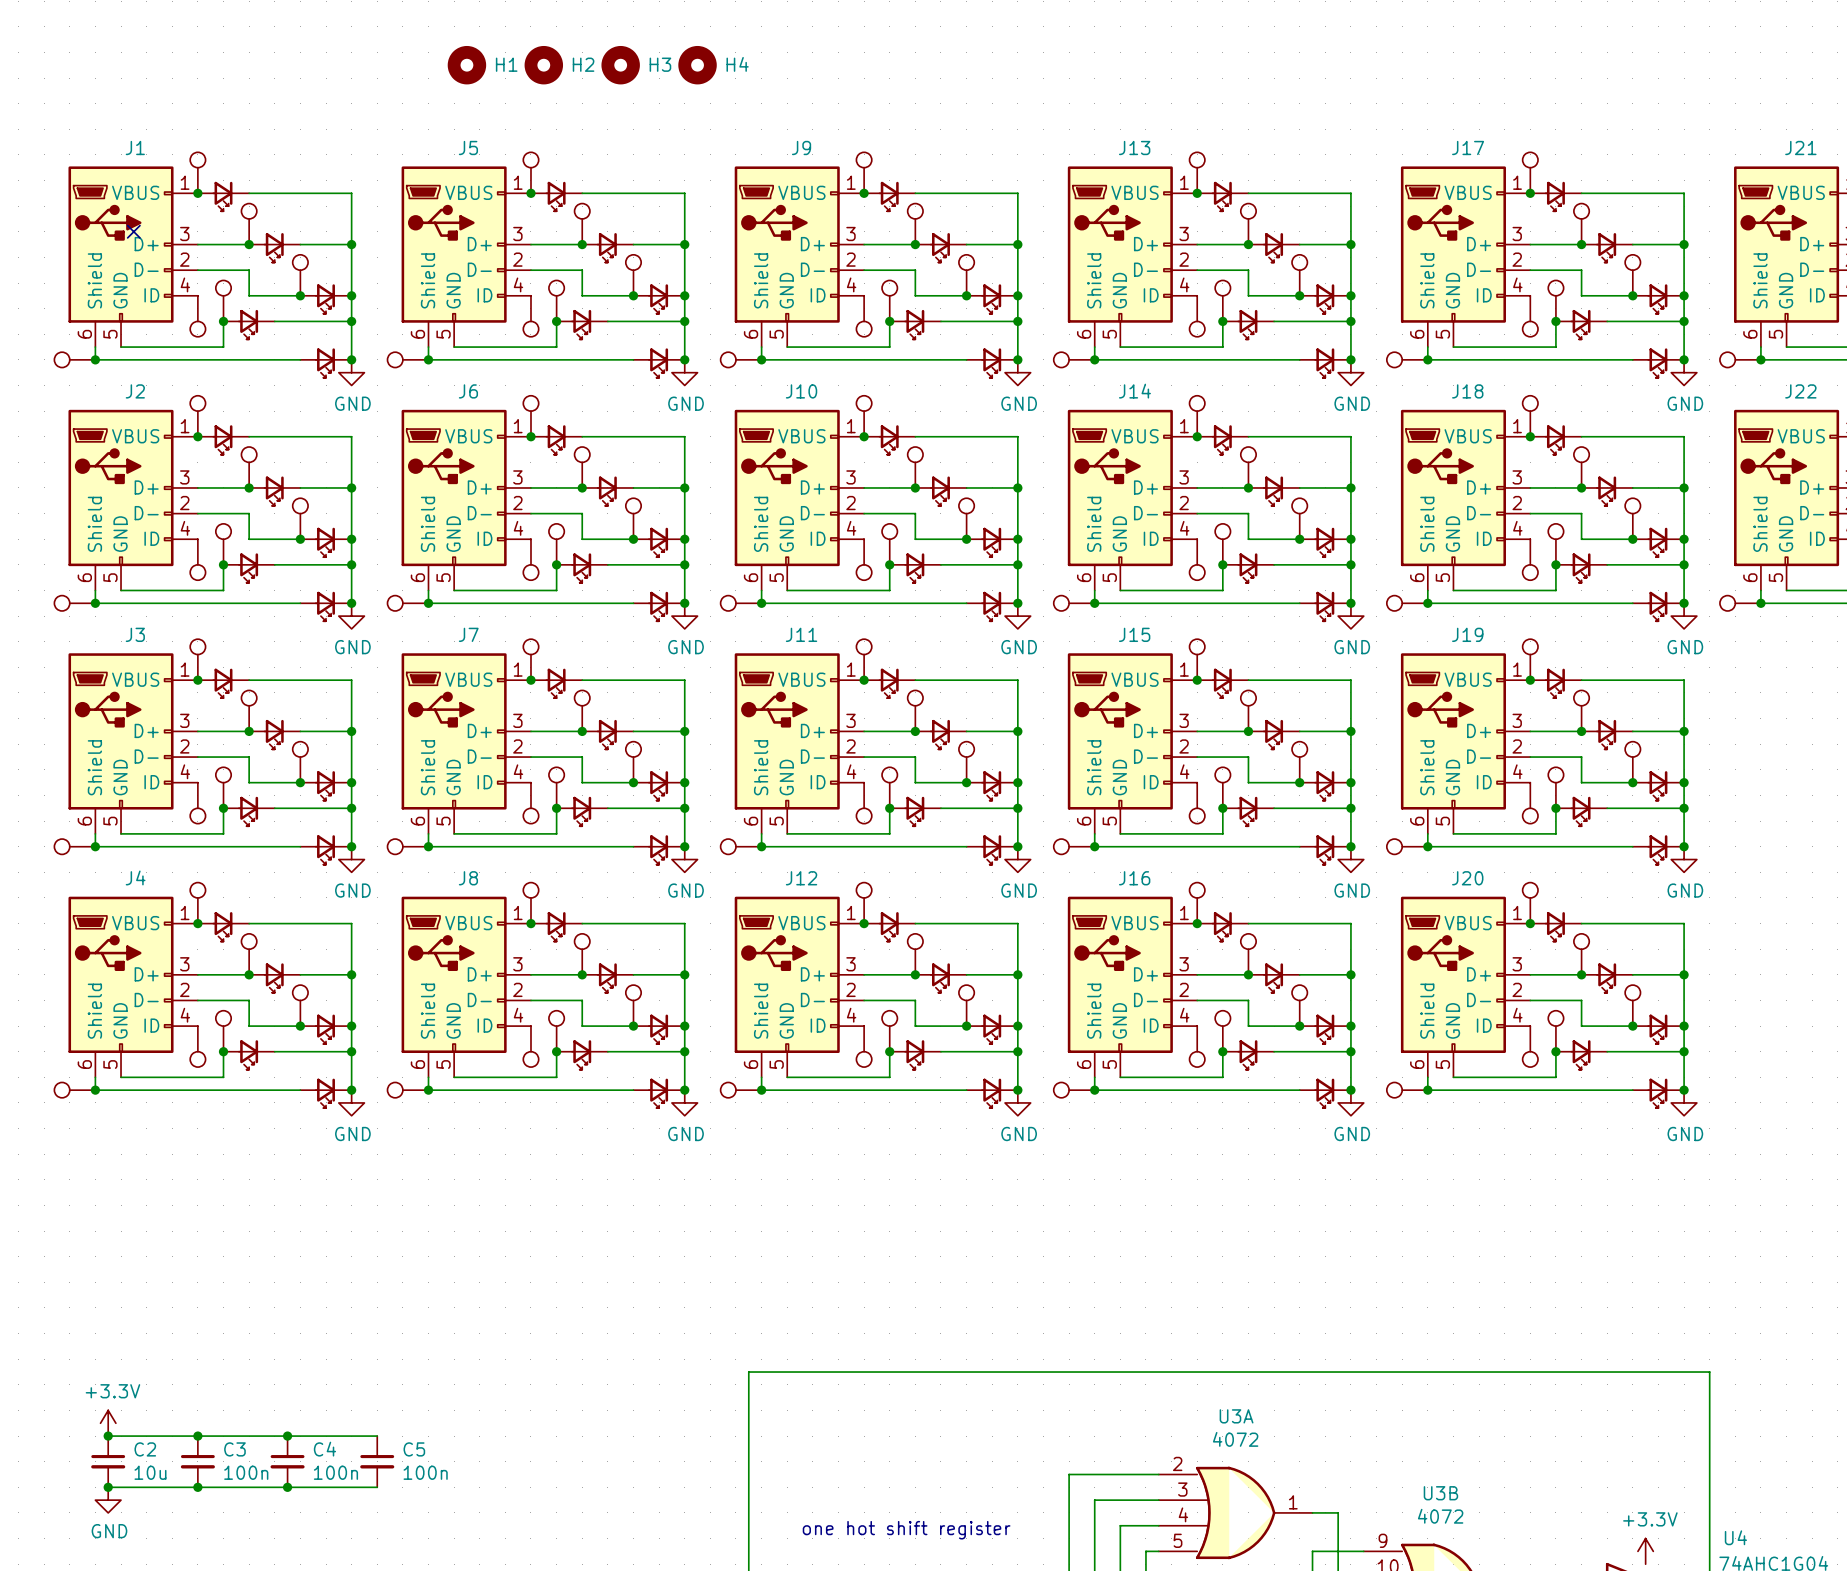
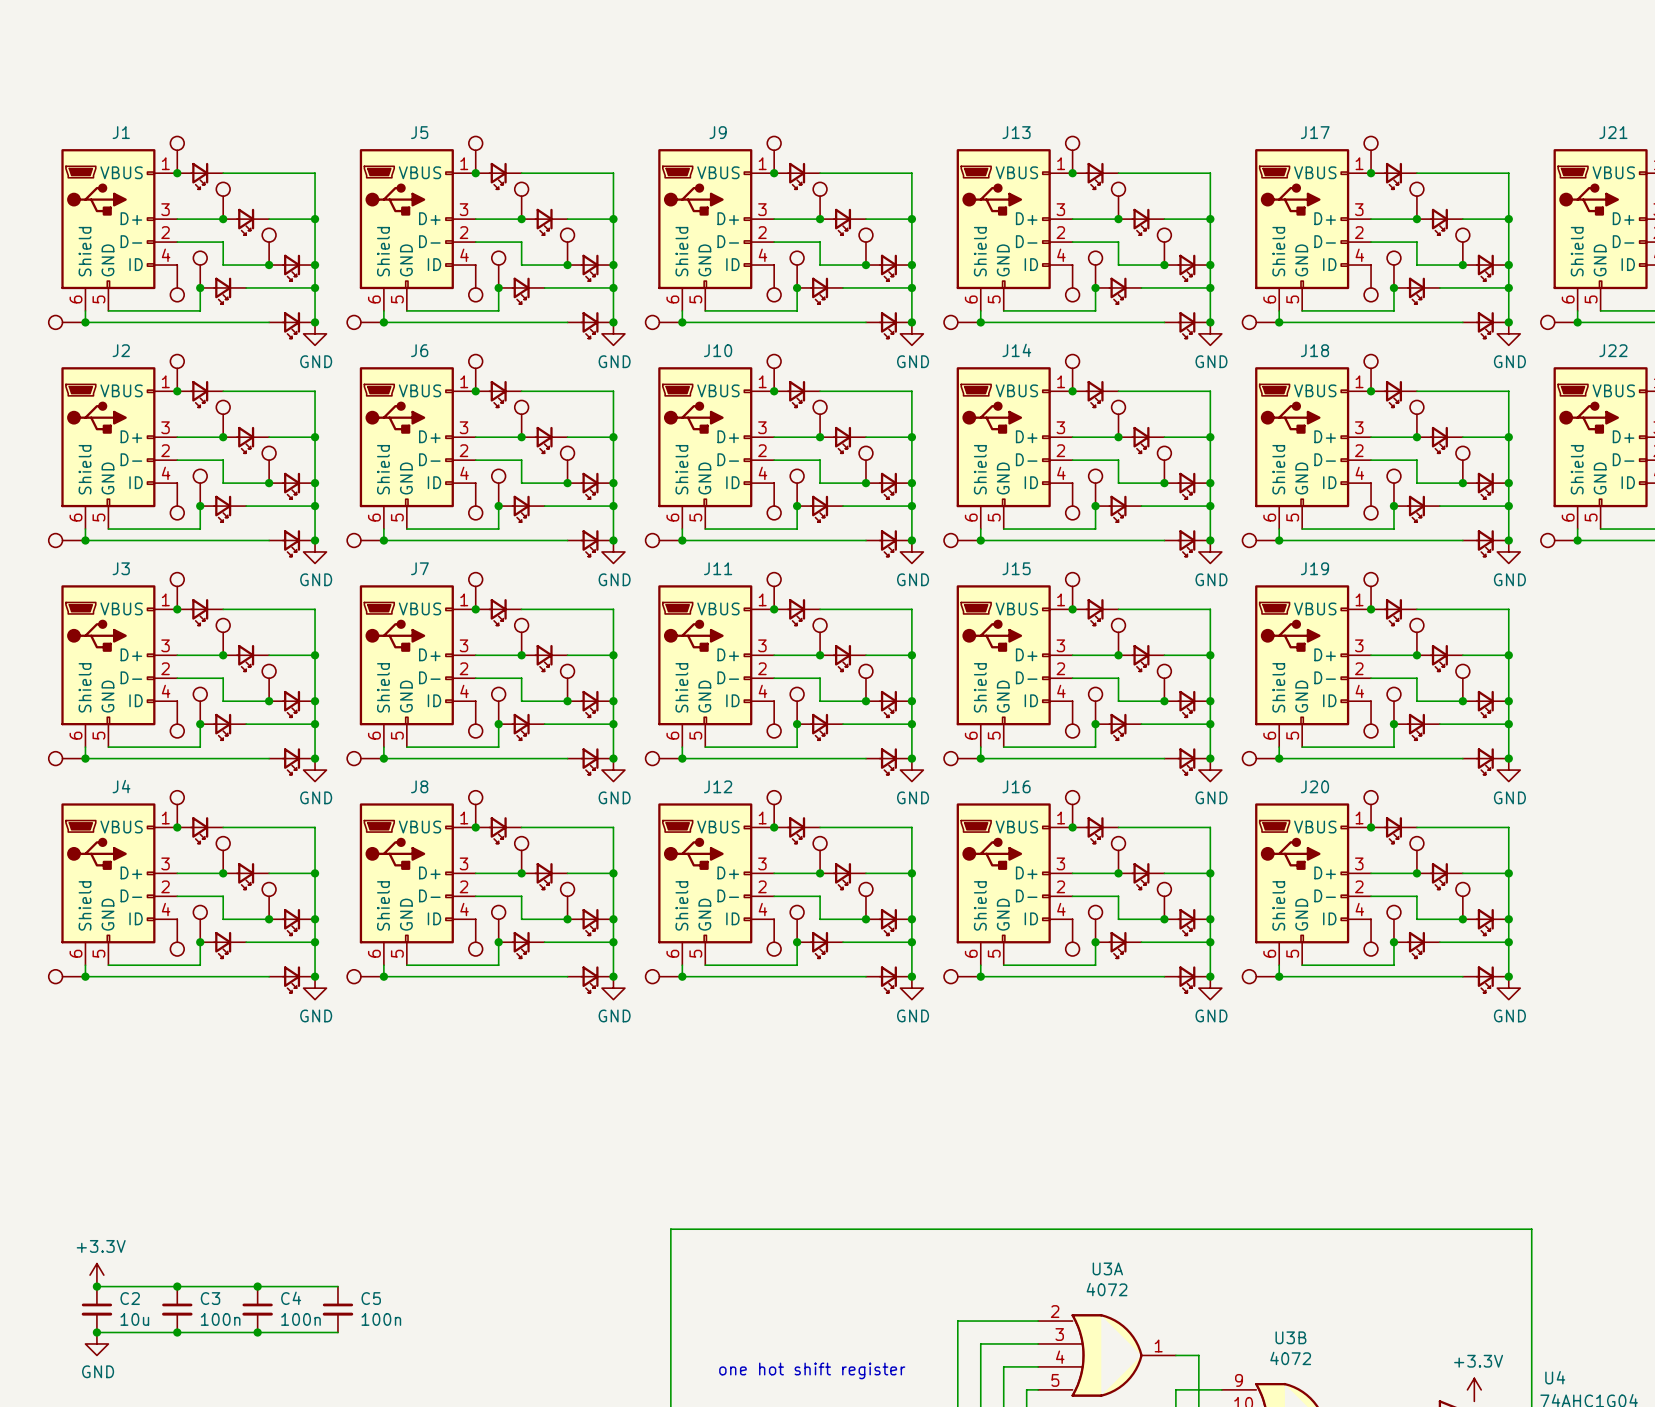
H1: (466, 65) -> none
H2: (543, 65) -> none
H3: (620, 65) -> none
H4: (697, 65) -> none
no-connect mark: (133, 231) -> none

